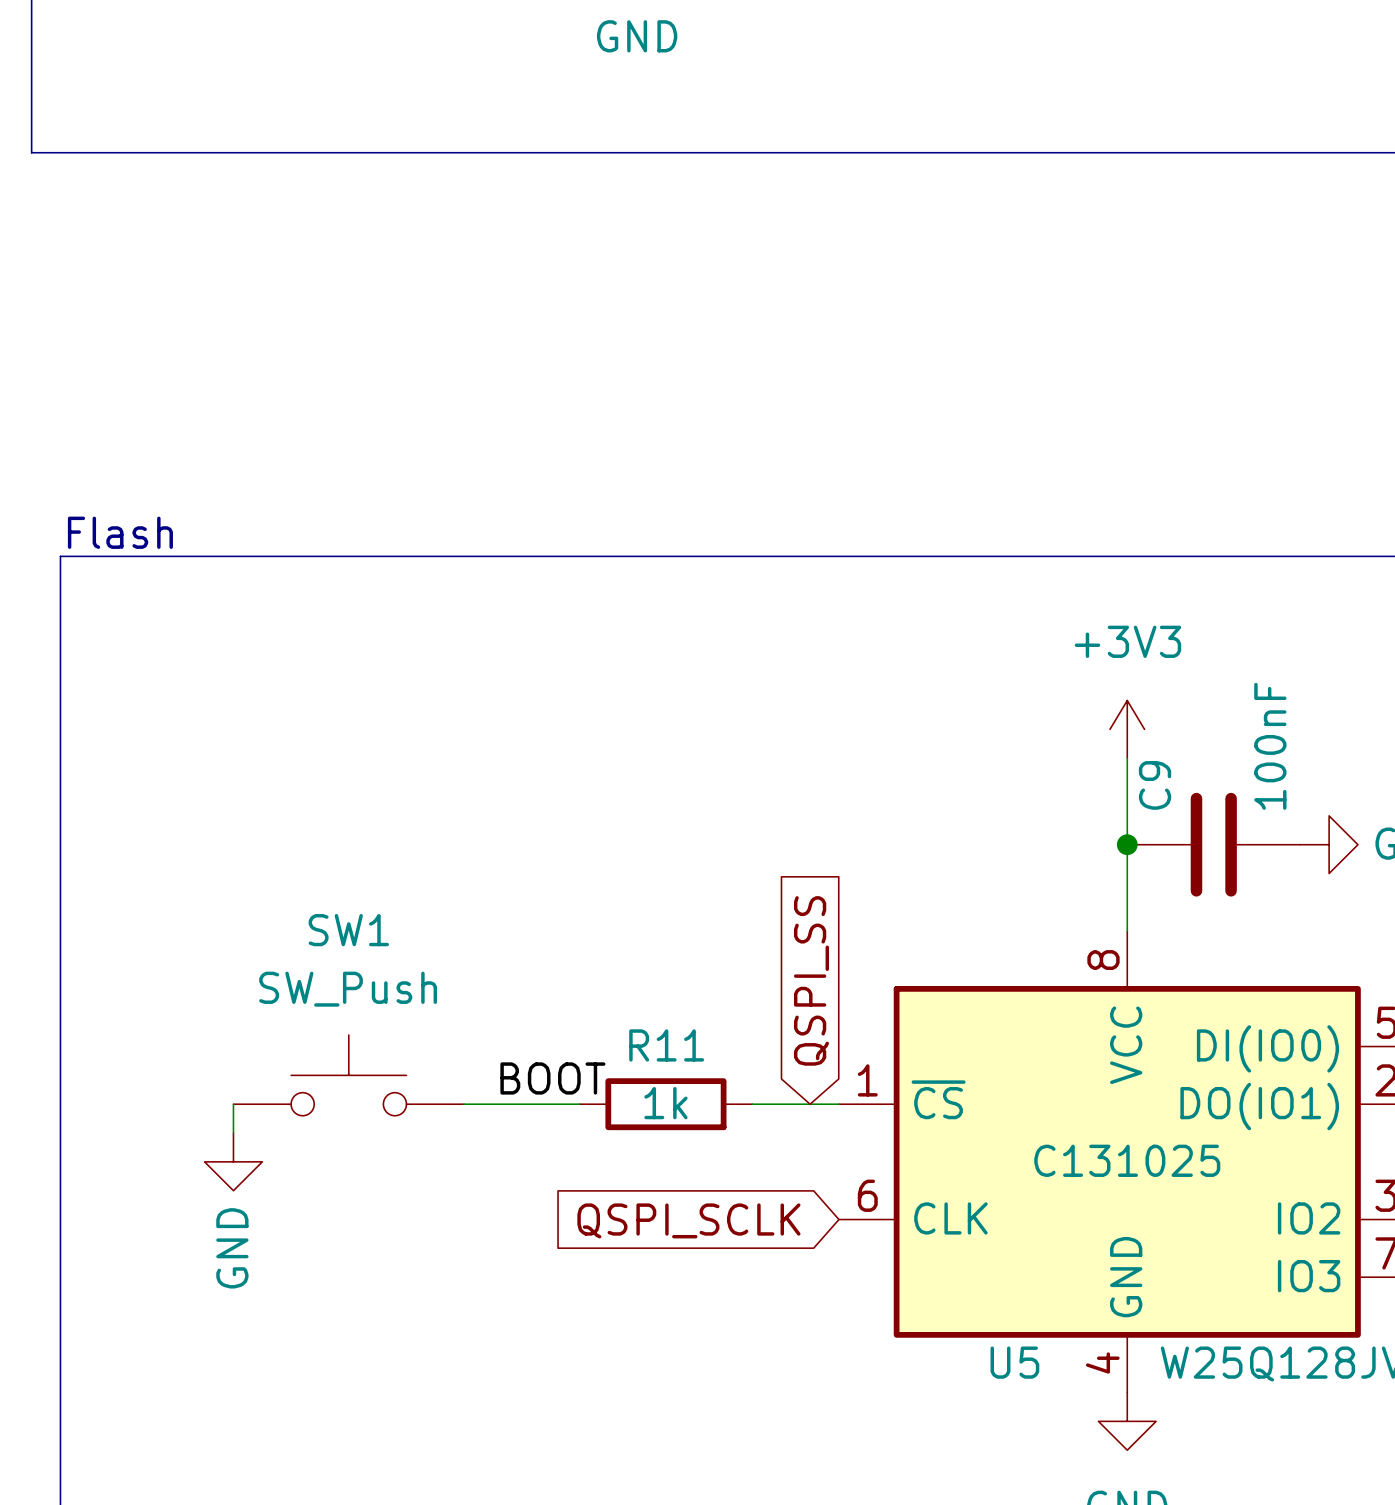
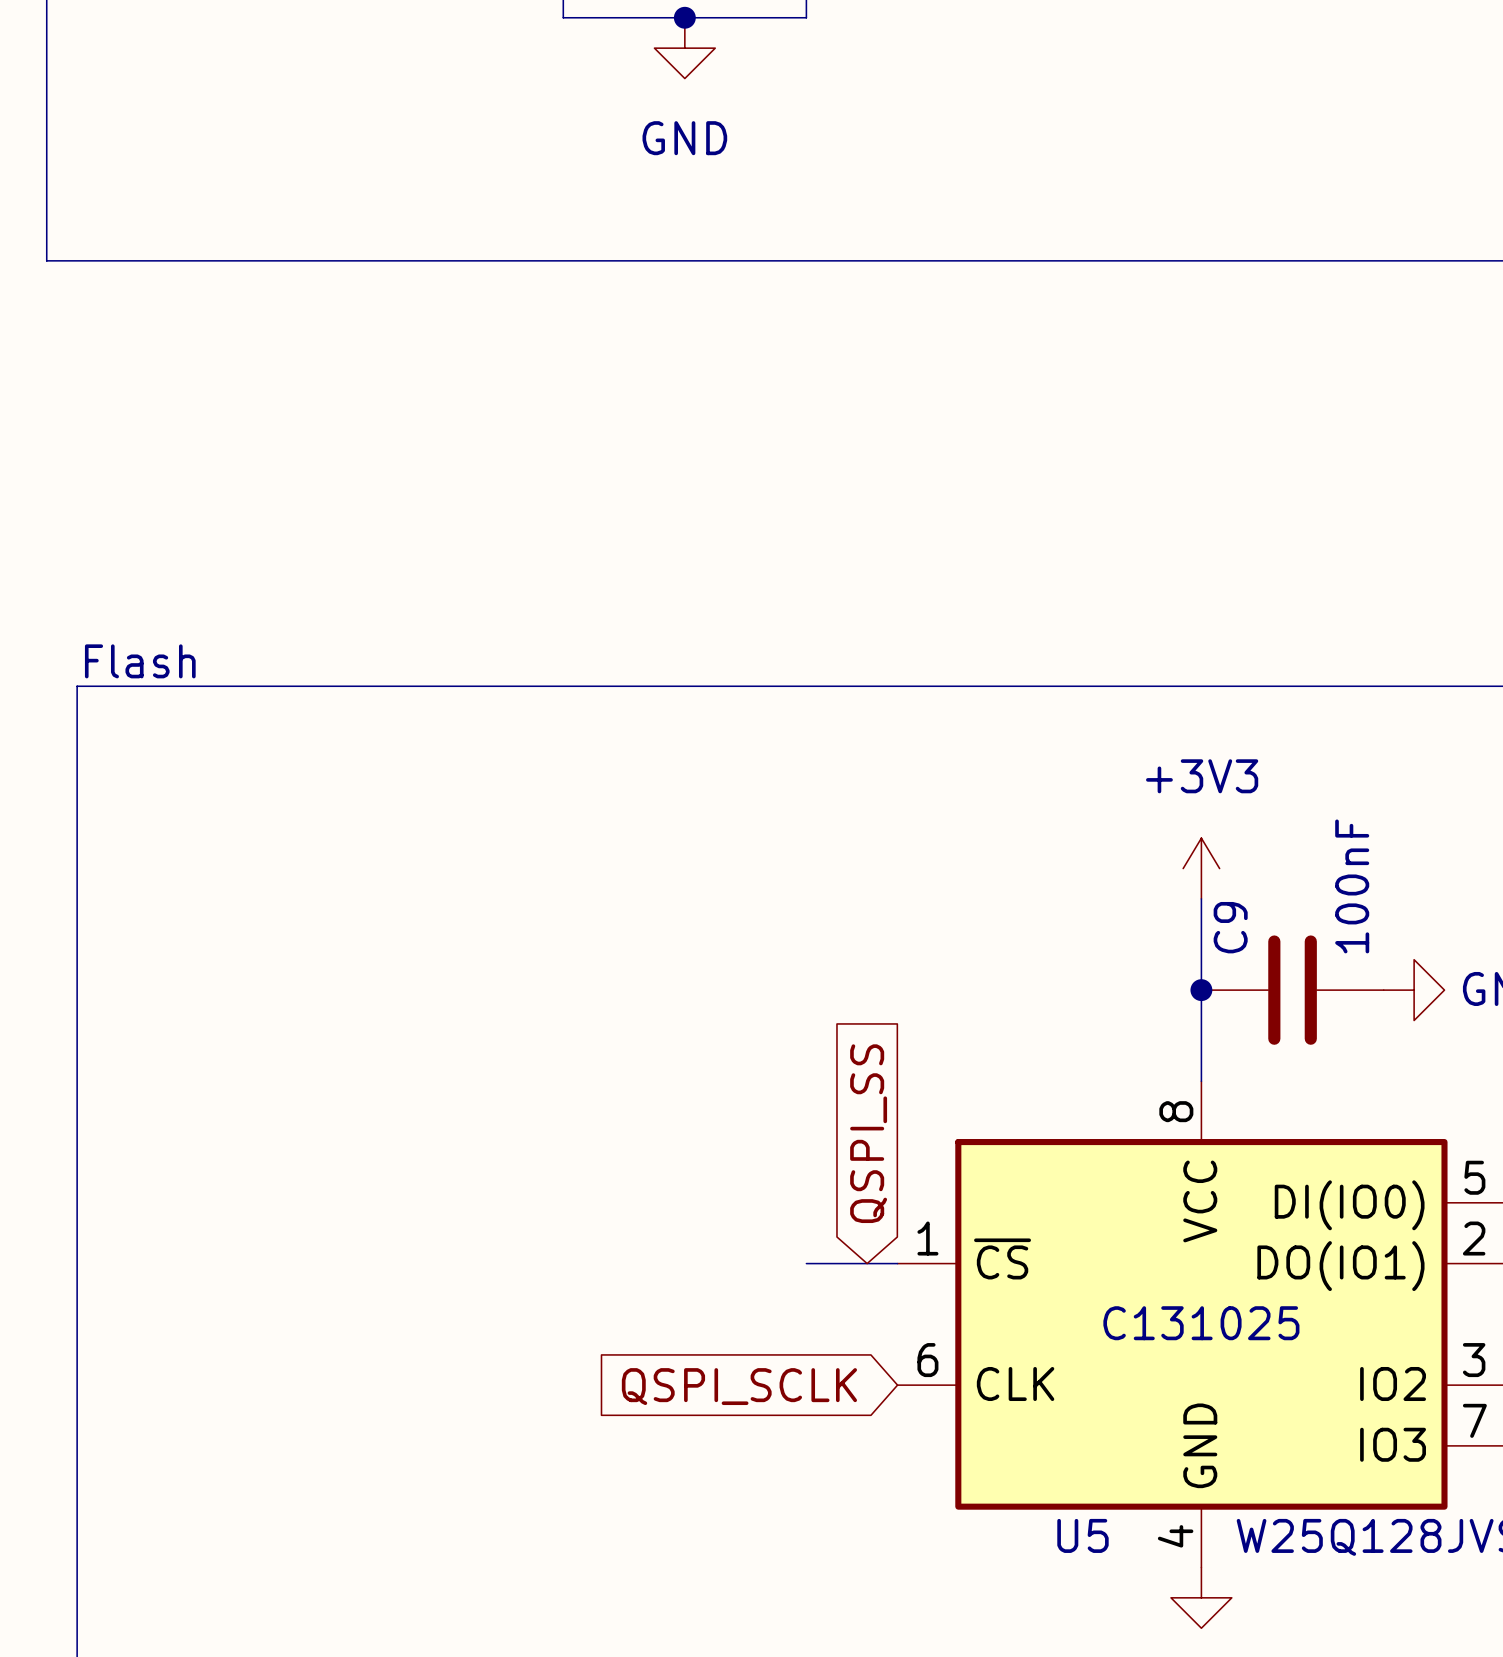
SW1: SW_Push (348, 1075) -> none
label: BOOT (552, 1078) -> none
wire: (233, 1104) (233, 1133) -> none
wire: (464, 1104) (579, 1104) -> none
R11: 1k (665, 1104) -> none
power symbol: GND (233, 1161) -> none

